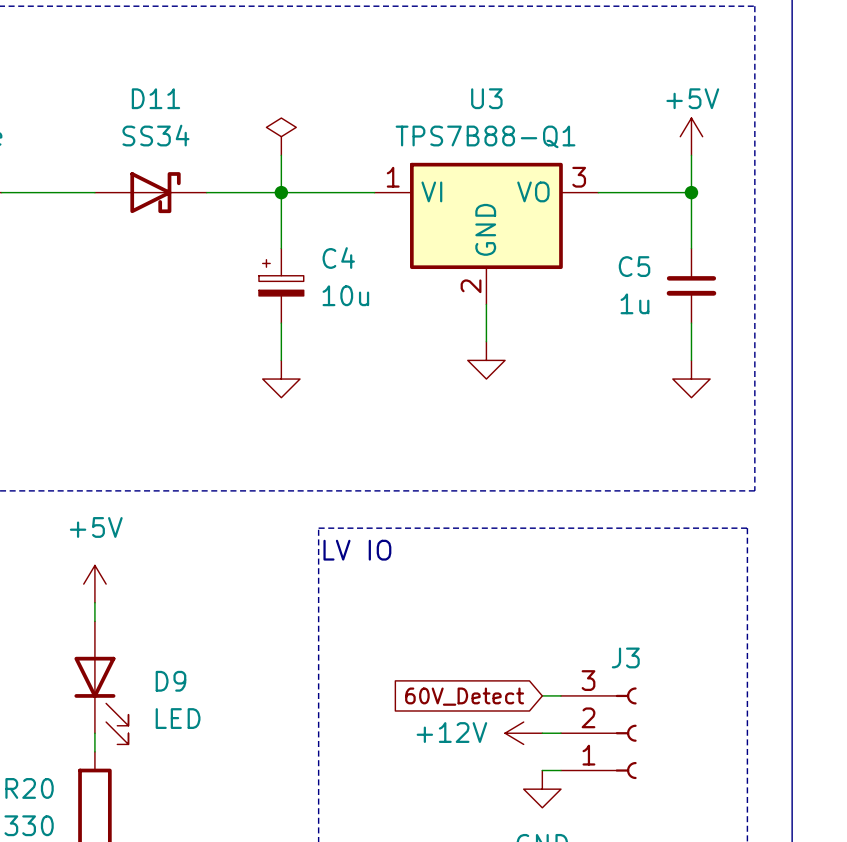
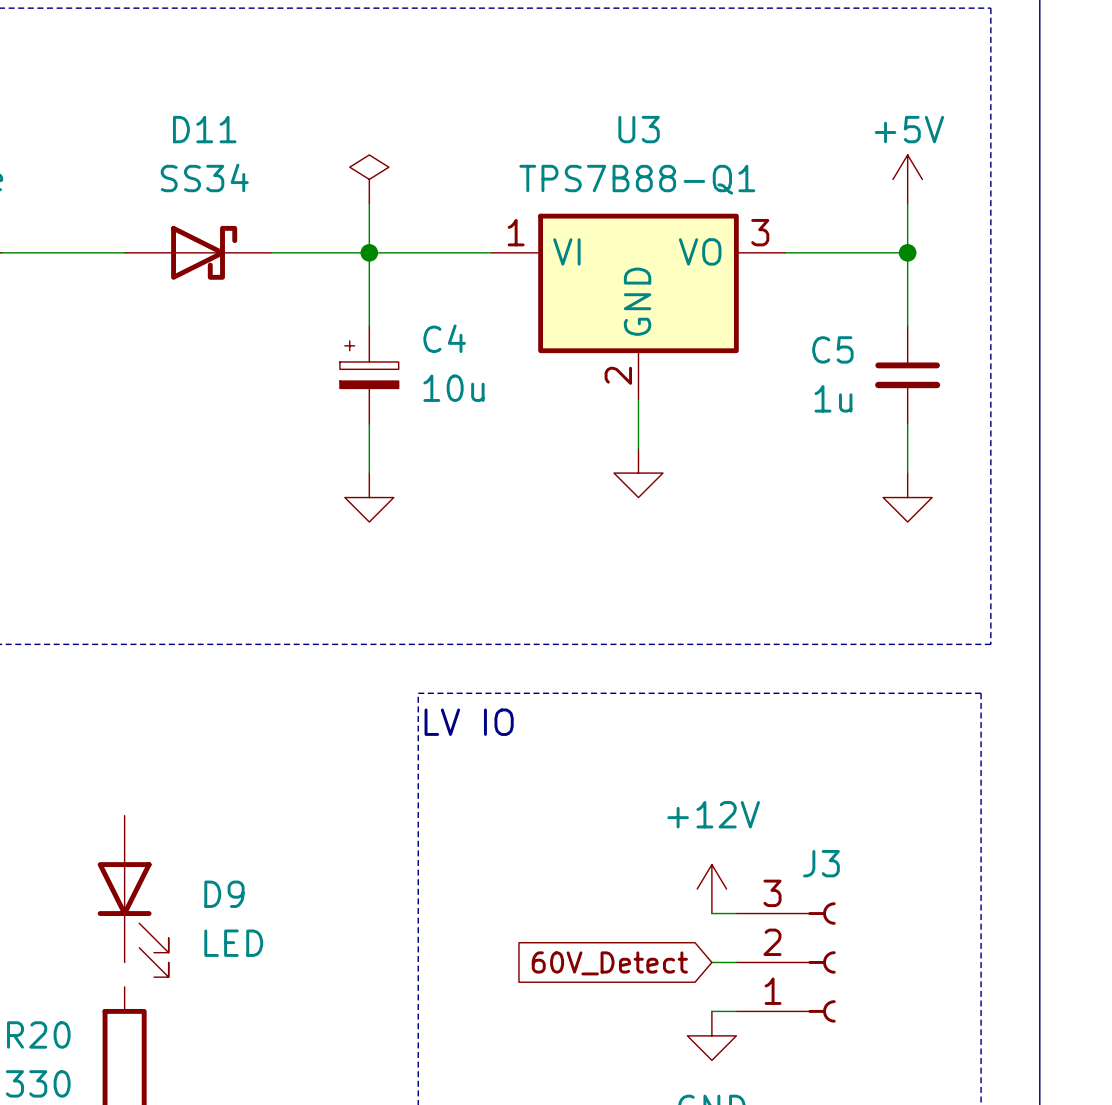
power symbol: +5V (94, 584) -> none
wire: (94, 602) (94, 621) -> none
global label position: 60V_Detect (464, 696) -> 60V_Detect (609, 963)
wire: (94, 733) (94, 751) -> none
power symbol rotation: 0° (523, 733) -> 90° clockwise (711, 889)
power symbol position: +12V (523, 733) -> +12V (711, 889)

